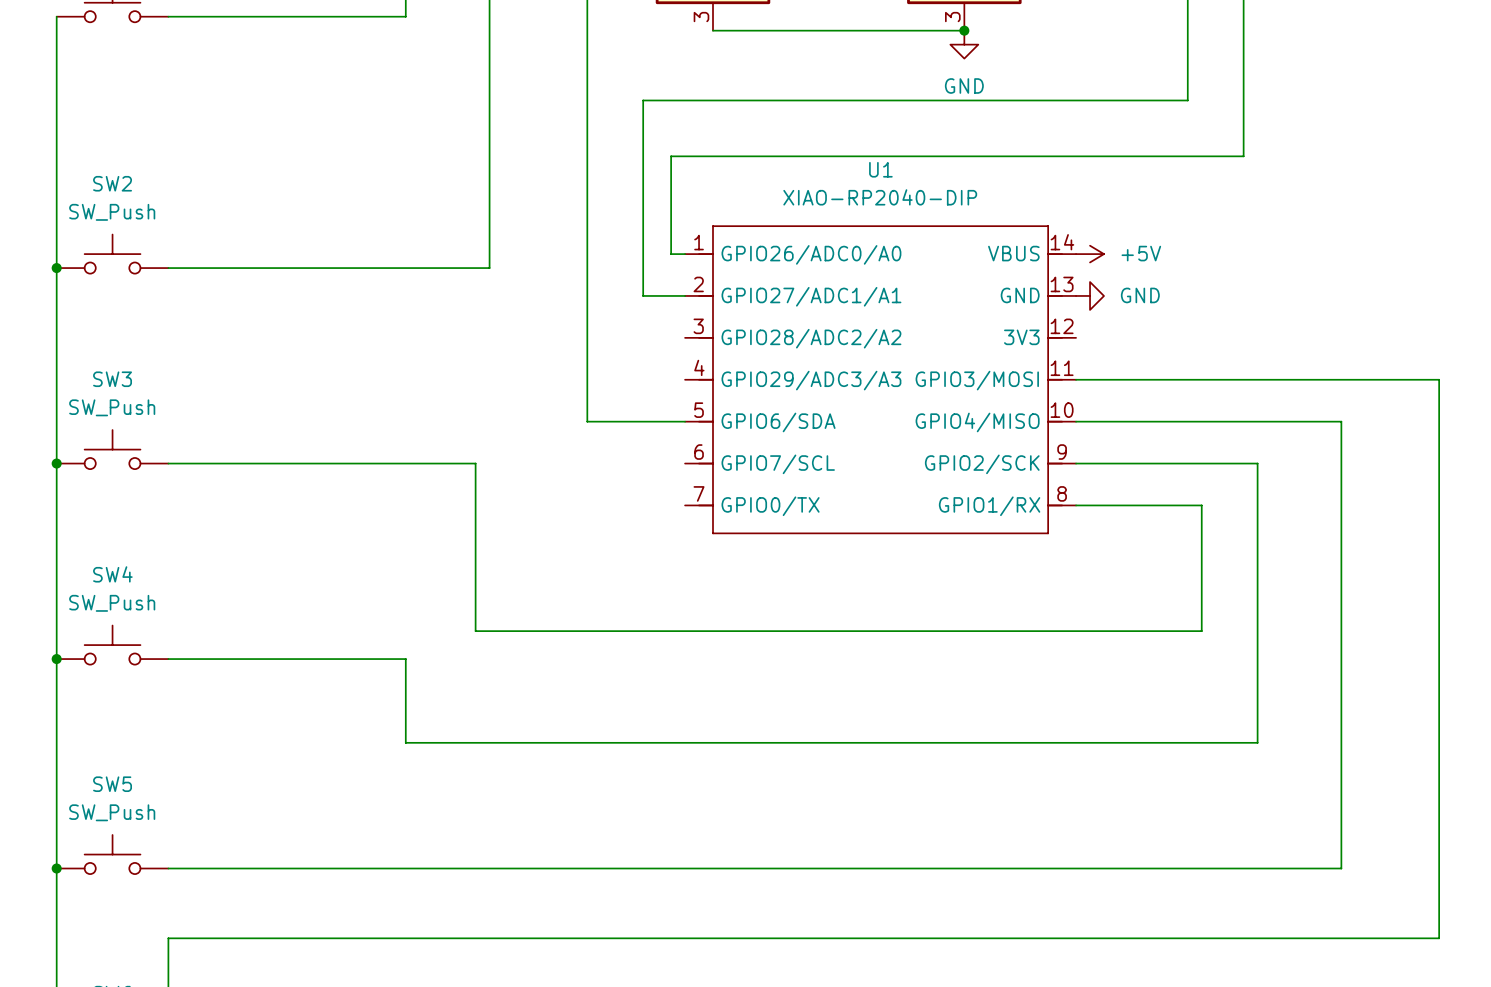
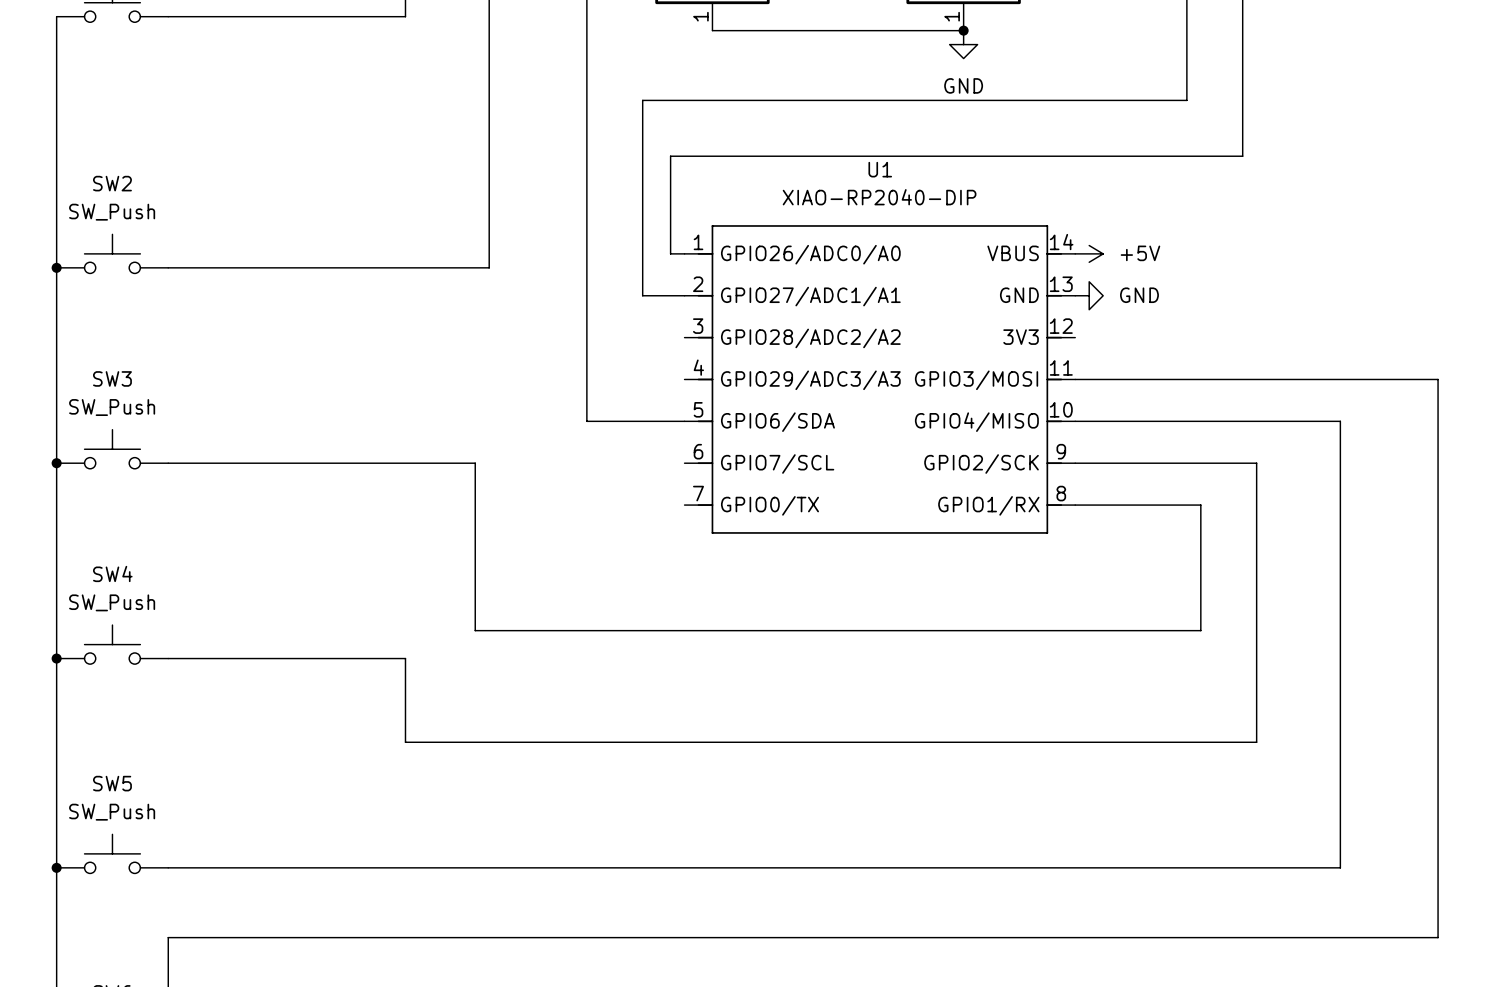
part pin number: 3 (701, 17) -> 1 (700, 16)
part pin number: 3 (952, 17) -> 1 (952, 16)

